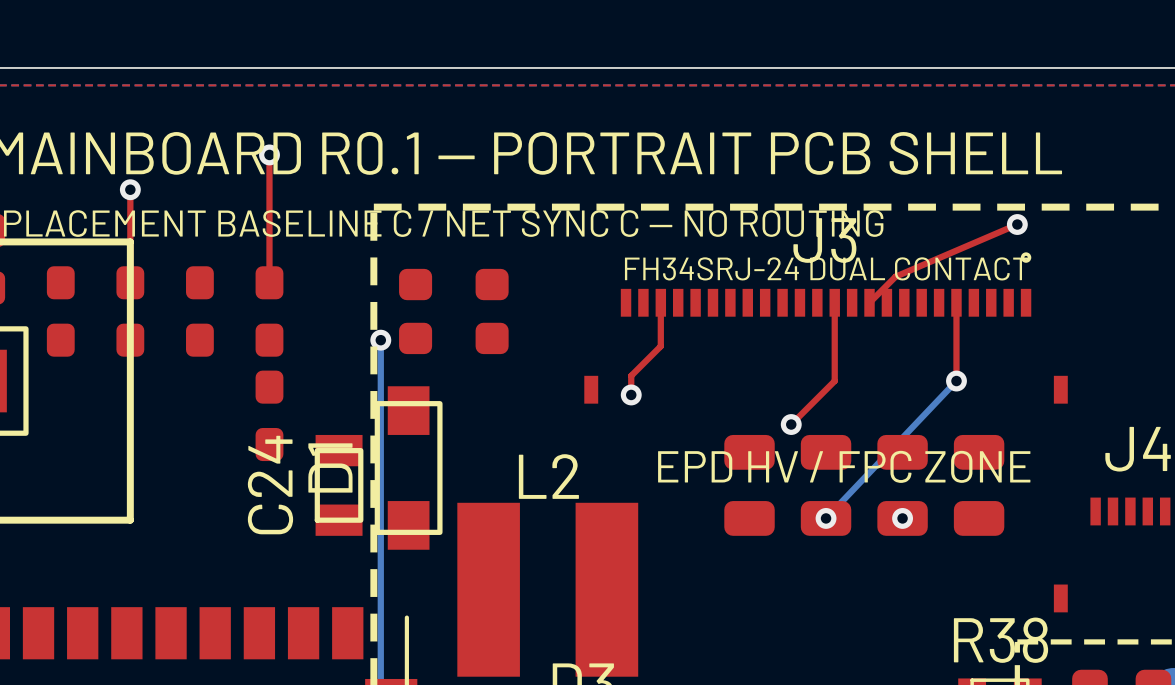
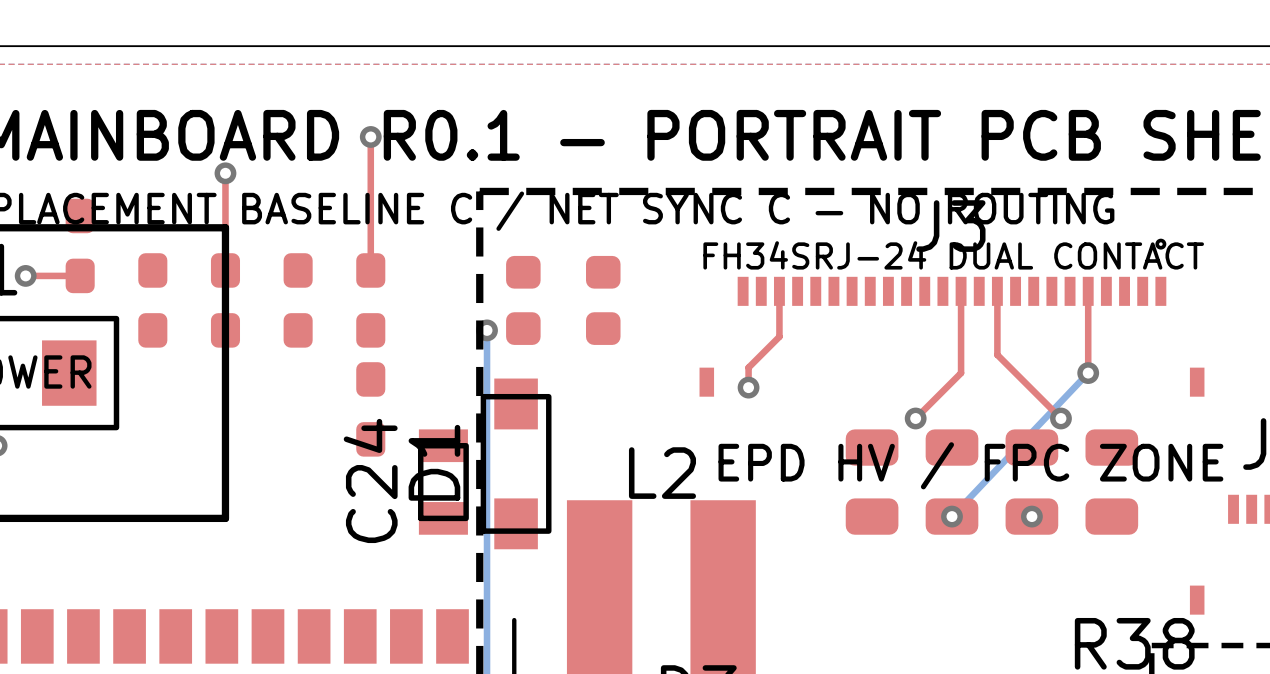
top track: (1017, 224) (895, 276) (869, 302) -> (1060, 418) (997, 354) (997, 291)
via: (1017, 224) -> none
via: none -> (1060, 418)

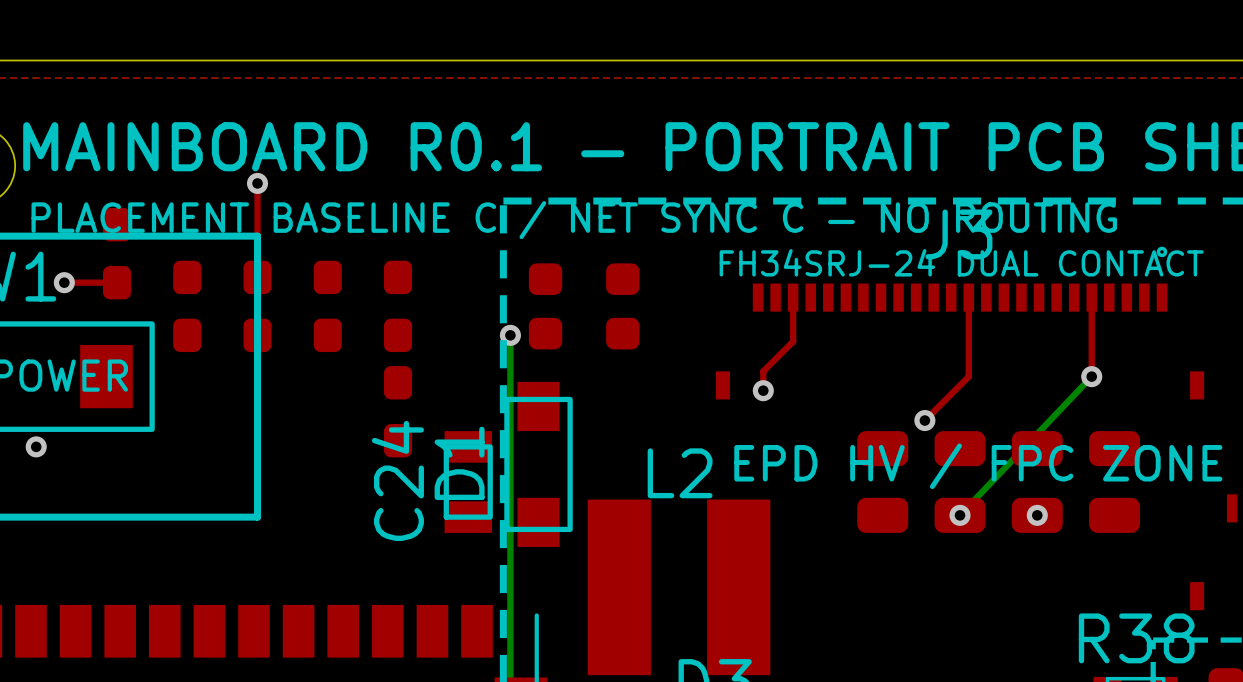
top track: (370, 136) (370, 270) -> none
via: (370, 136) -> none
top track: (997, 291) (997, 354) (1060, 418) -> none
via: (1060, 418) -> none

